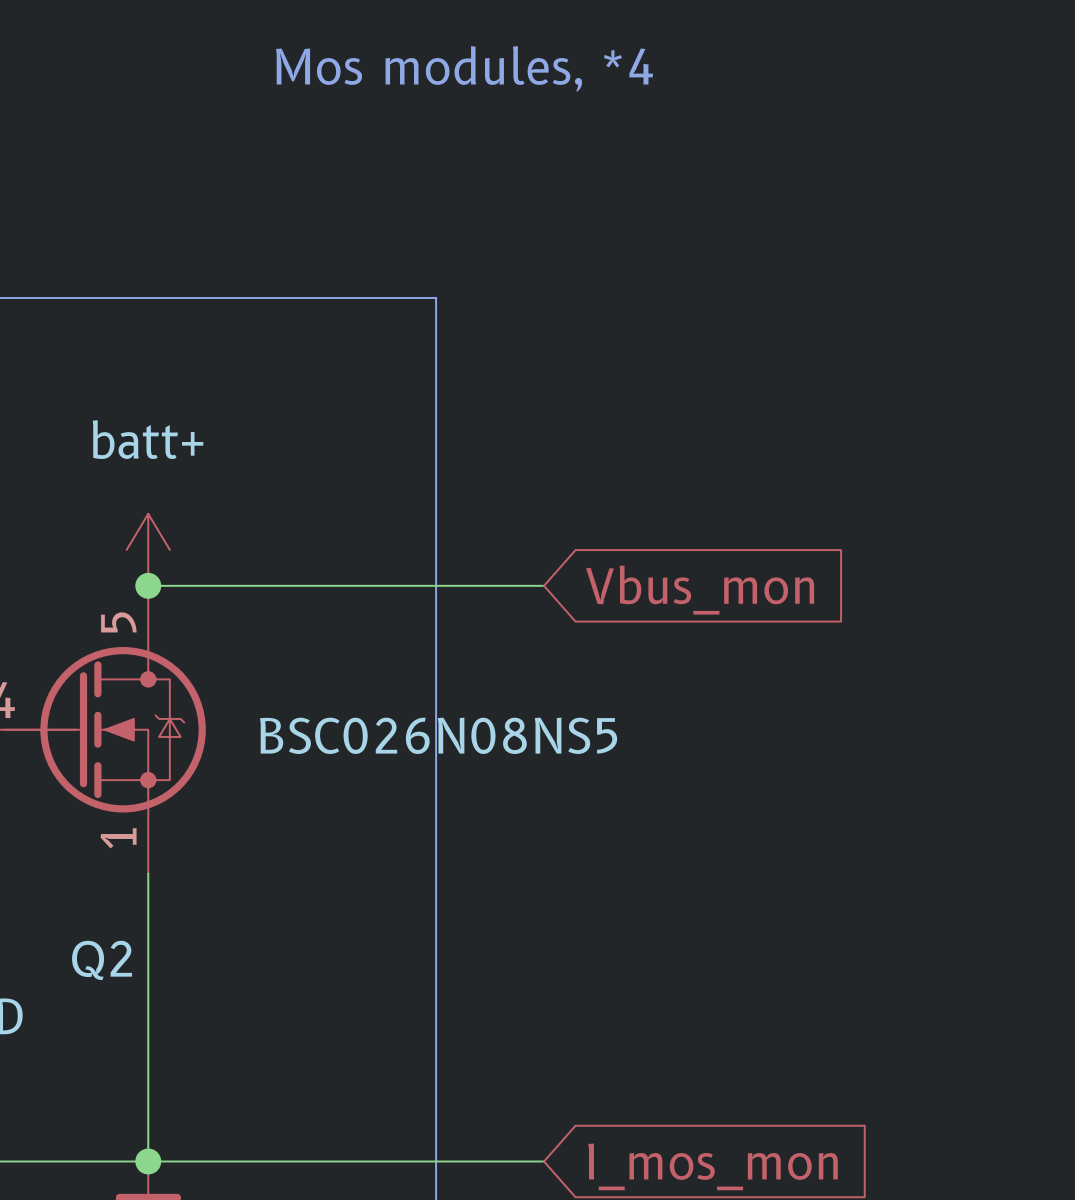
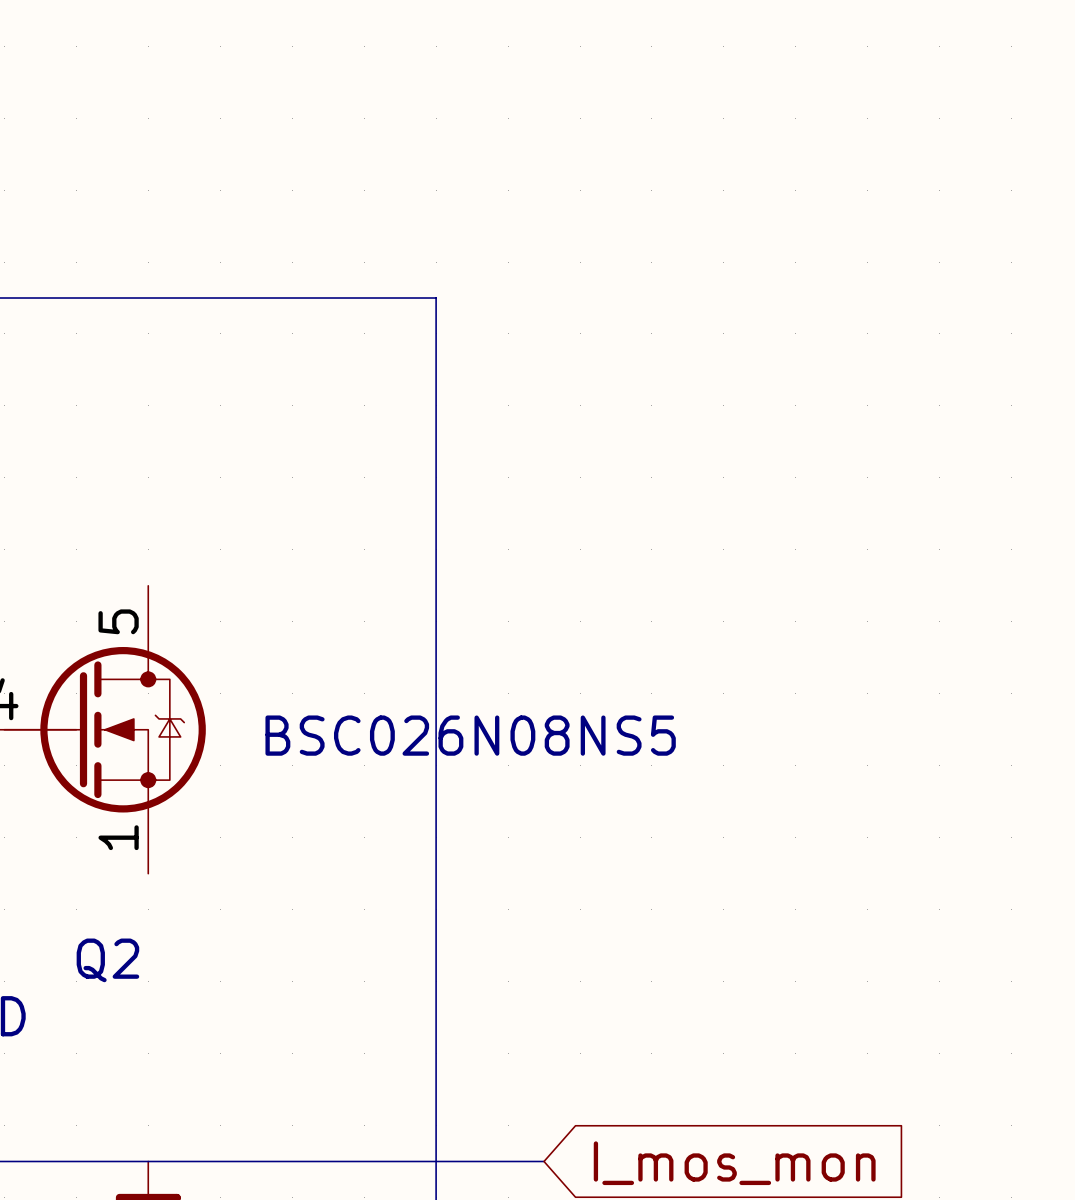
text: Mos modules, *4 (464, 68) -> none
power symbol: batt+ (148, 549) -> none
wire: (148, 585) (544, 585) -> none
junction: (148, 585) -> none
global label: Vbus_mon (700, 590) -> none
wire: (148, 873) (148, 1161) -> none
junction: (148, 1161) -> none

